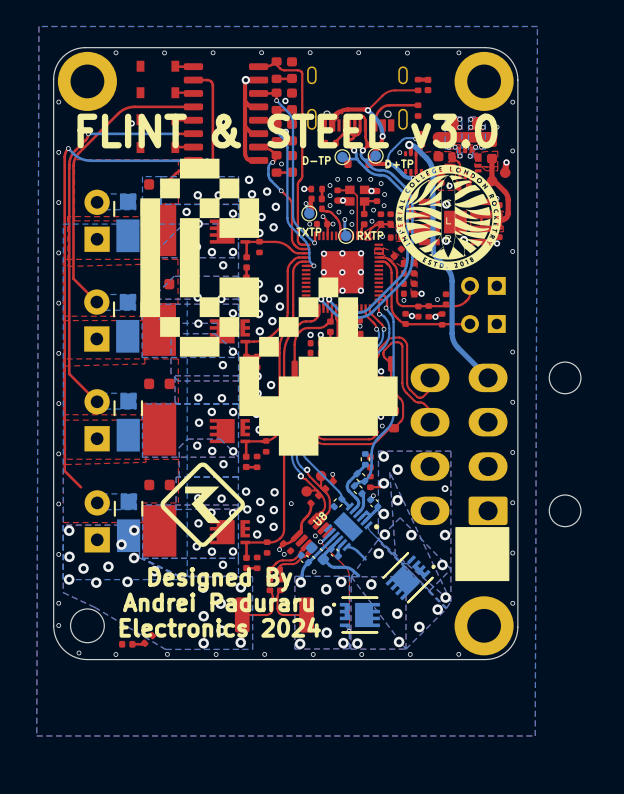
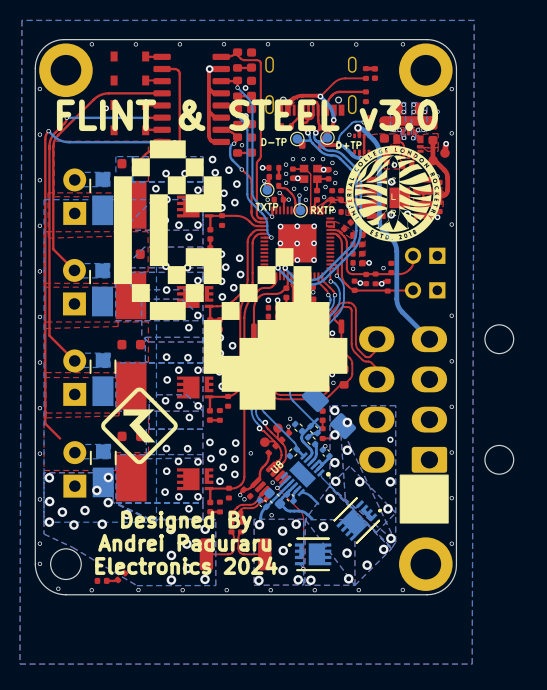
bottom track: (386, 307) (393, 320) (393, 416) (389, 426) (373, 445) (371, 470) (365, 480) -> (336, 275) (343, 287) (343, 301) (341, 310) (297, 355) (290, 373) (291, 398) (319, 427) (318, 431)
part: none -> (328, 412)
part: (365, 459) -> none
via: none -> (290, 418)
part: none -> (298, 427)
drawing position: (202, 504) -> (139, 425)

